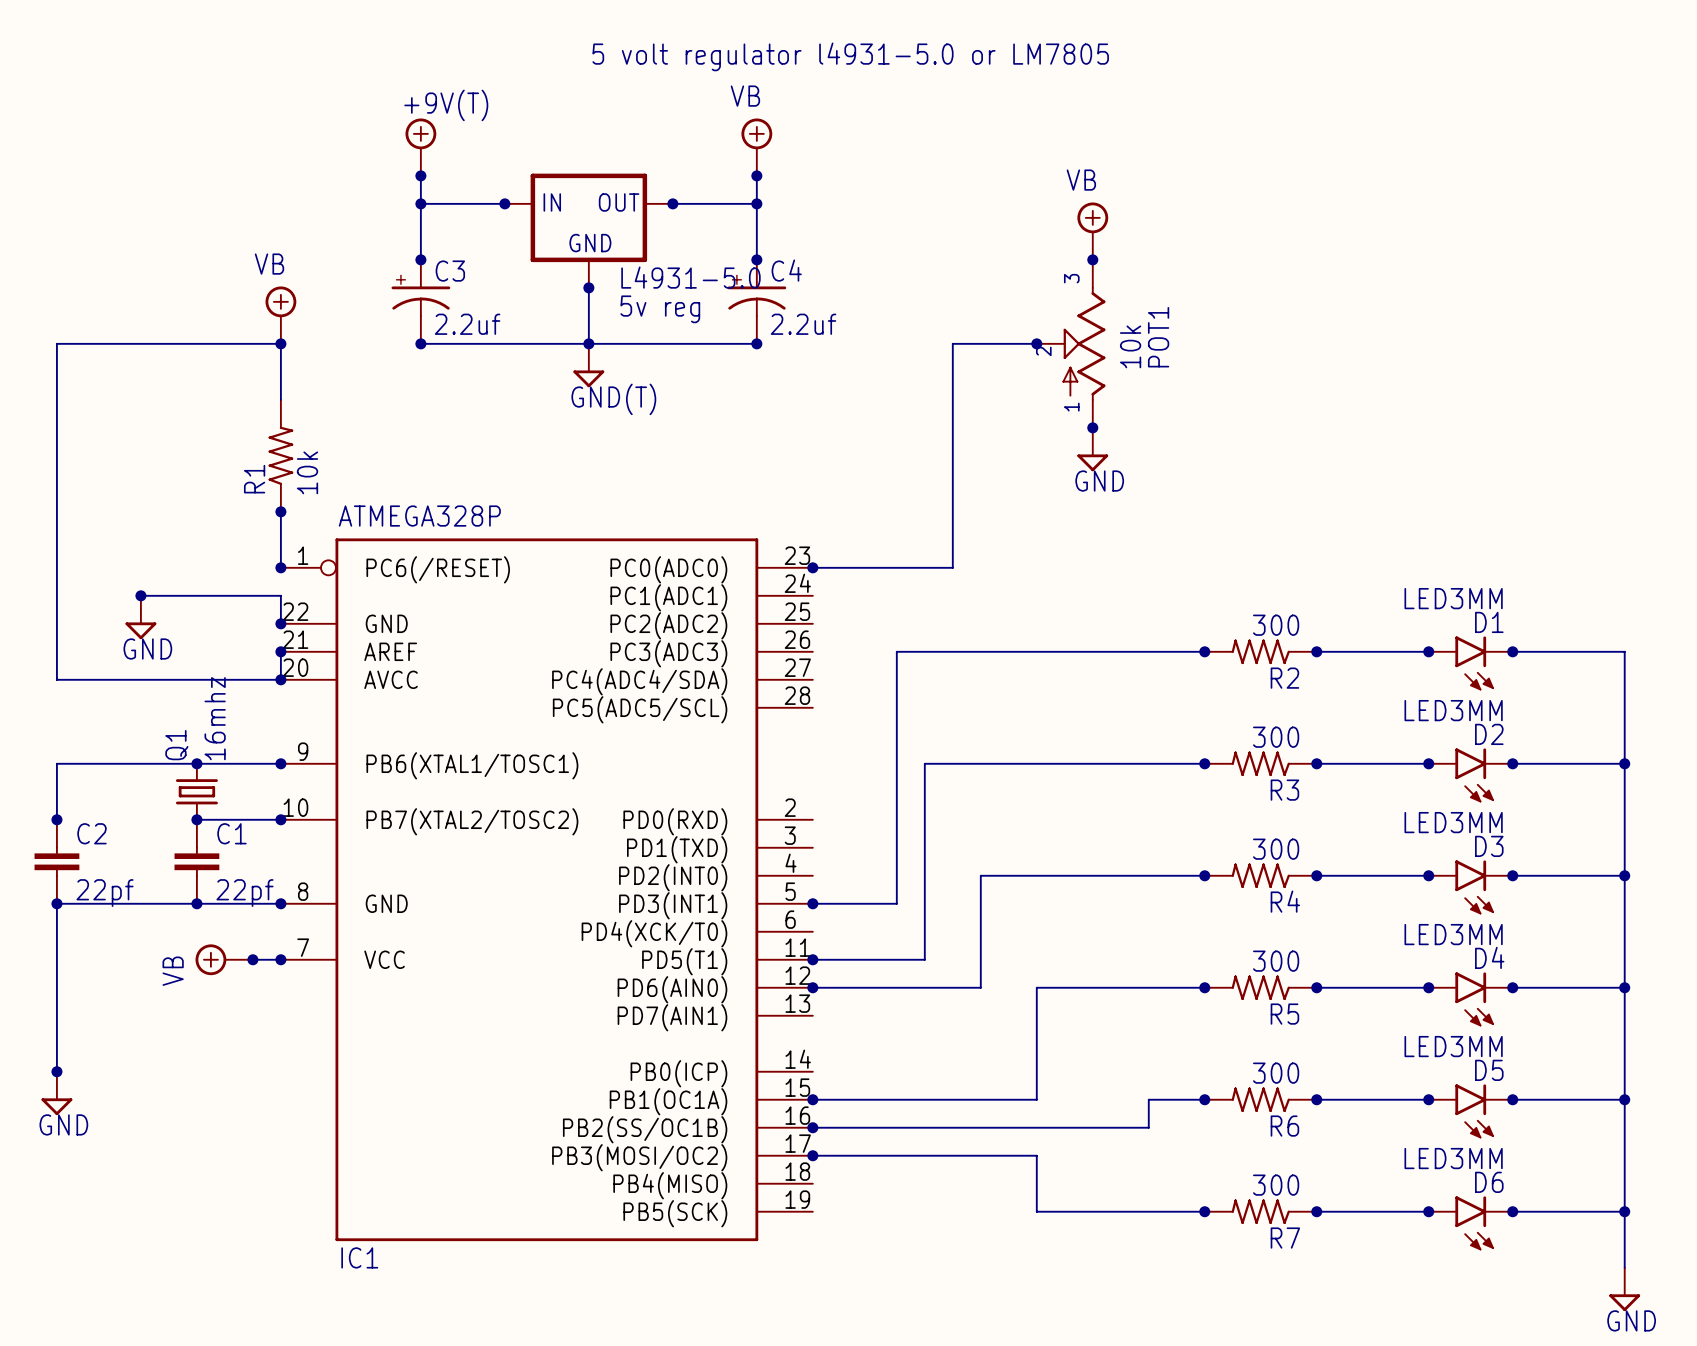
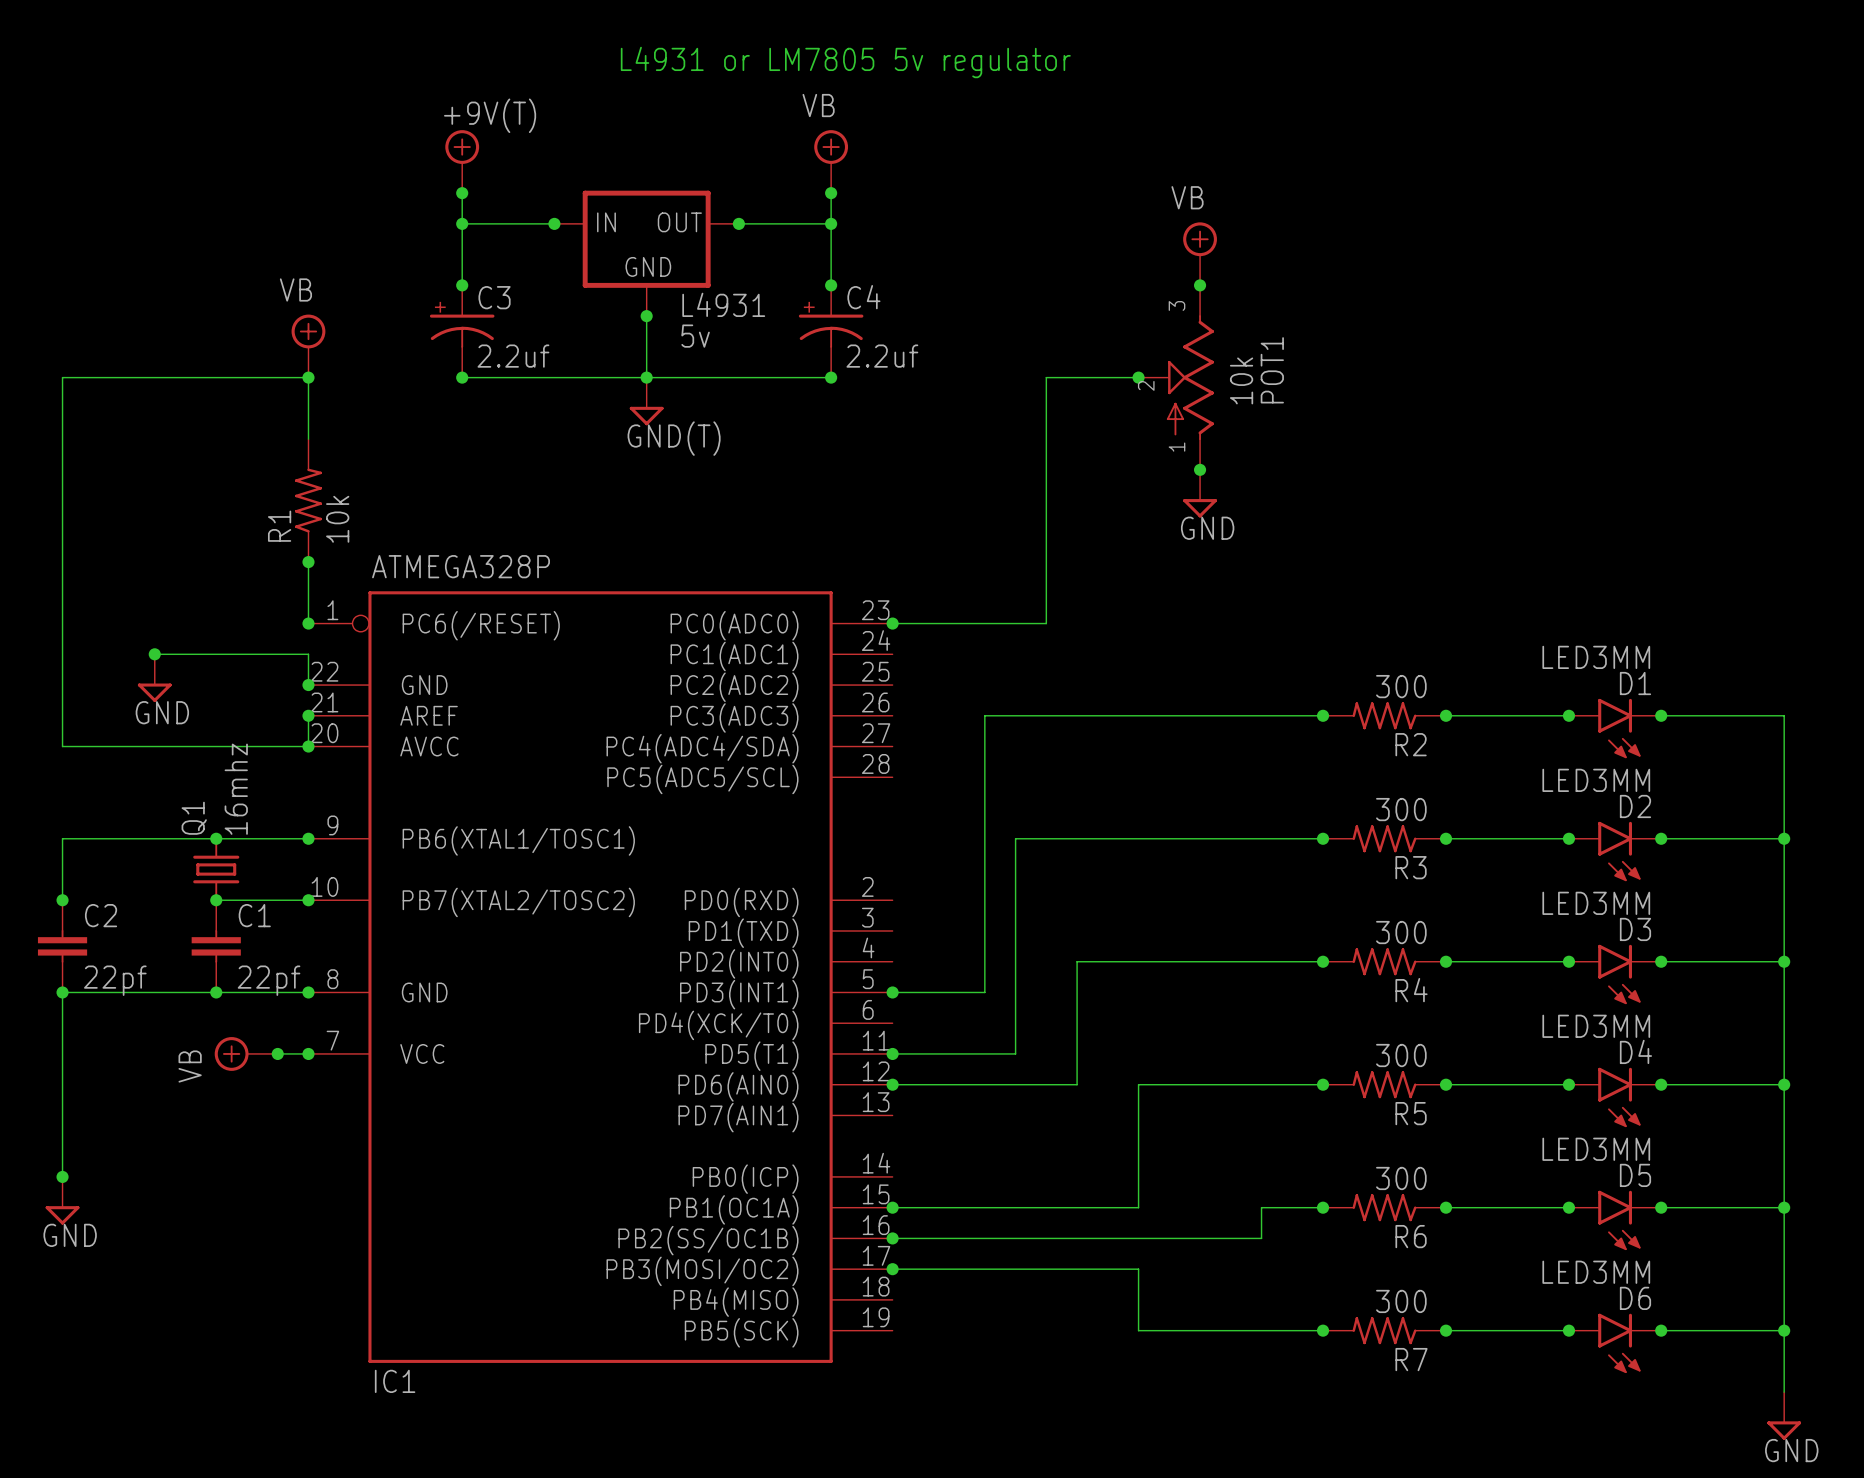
text: none -> L4931 or LM7805 5v regulator (845, 62)
text: 5 volt regulator l4931-5.0 or LM7805 (850, 56) -> none
L4931-5.0 name: L4931-5.0 (690, 277) -> L4931 (723, 304)
L4931-5.0 value: 5v reg (660, 309) -> 5v (695, 336)

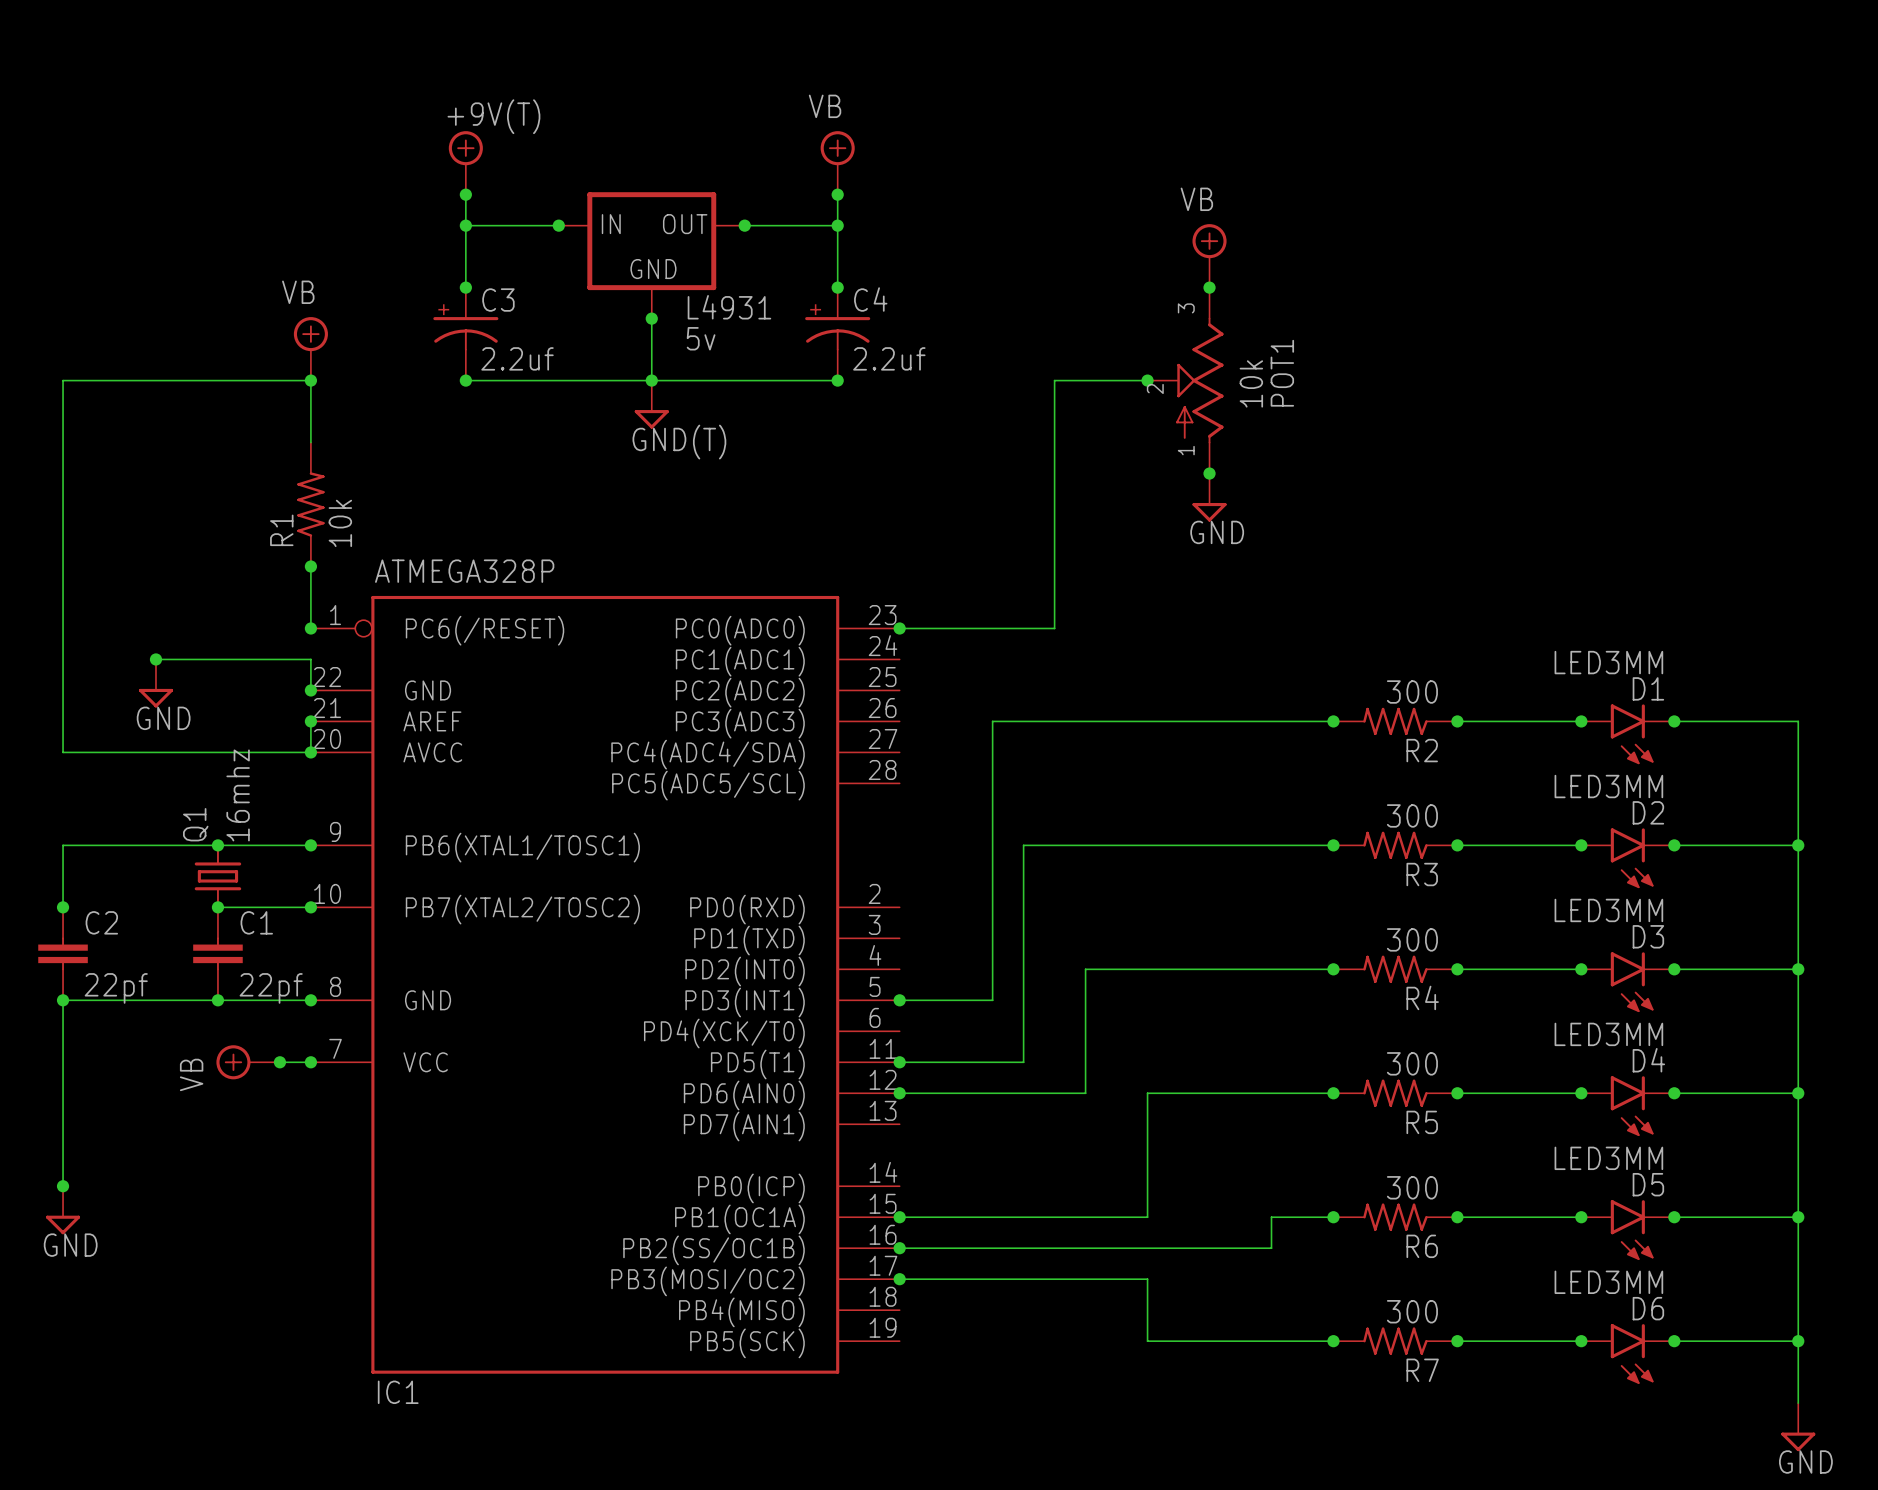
text: L4931 or LM7805 5v regulator (845, 62) -> none

